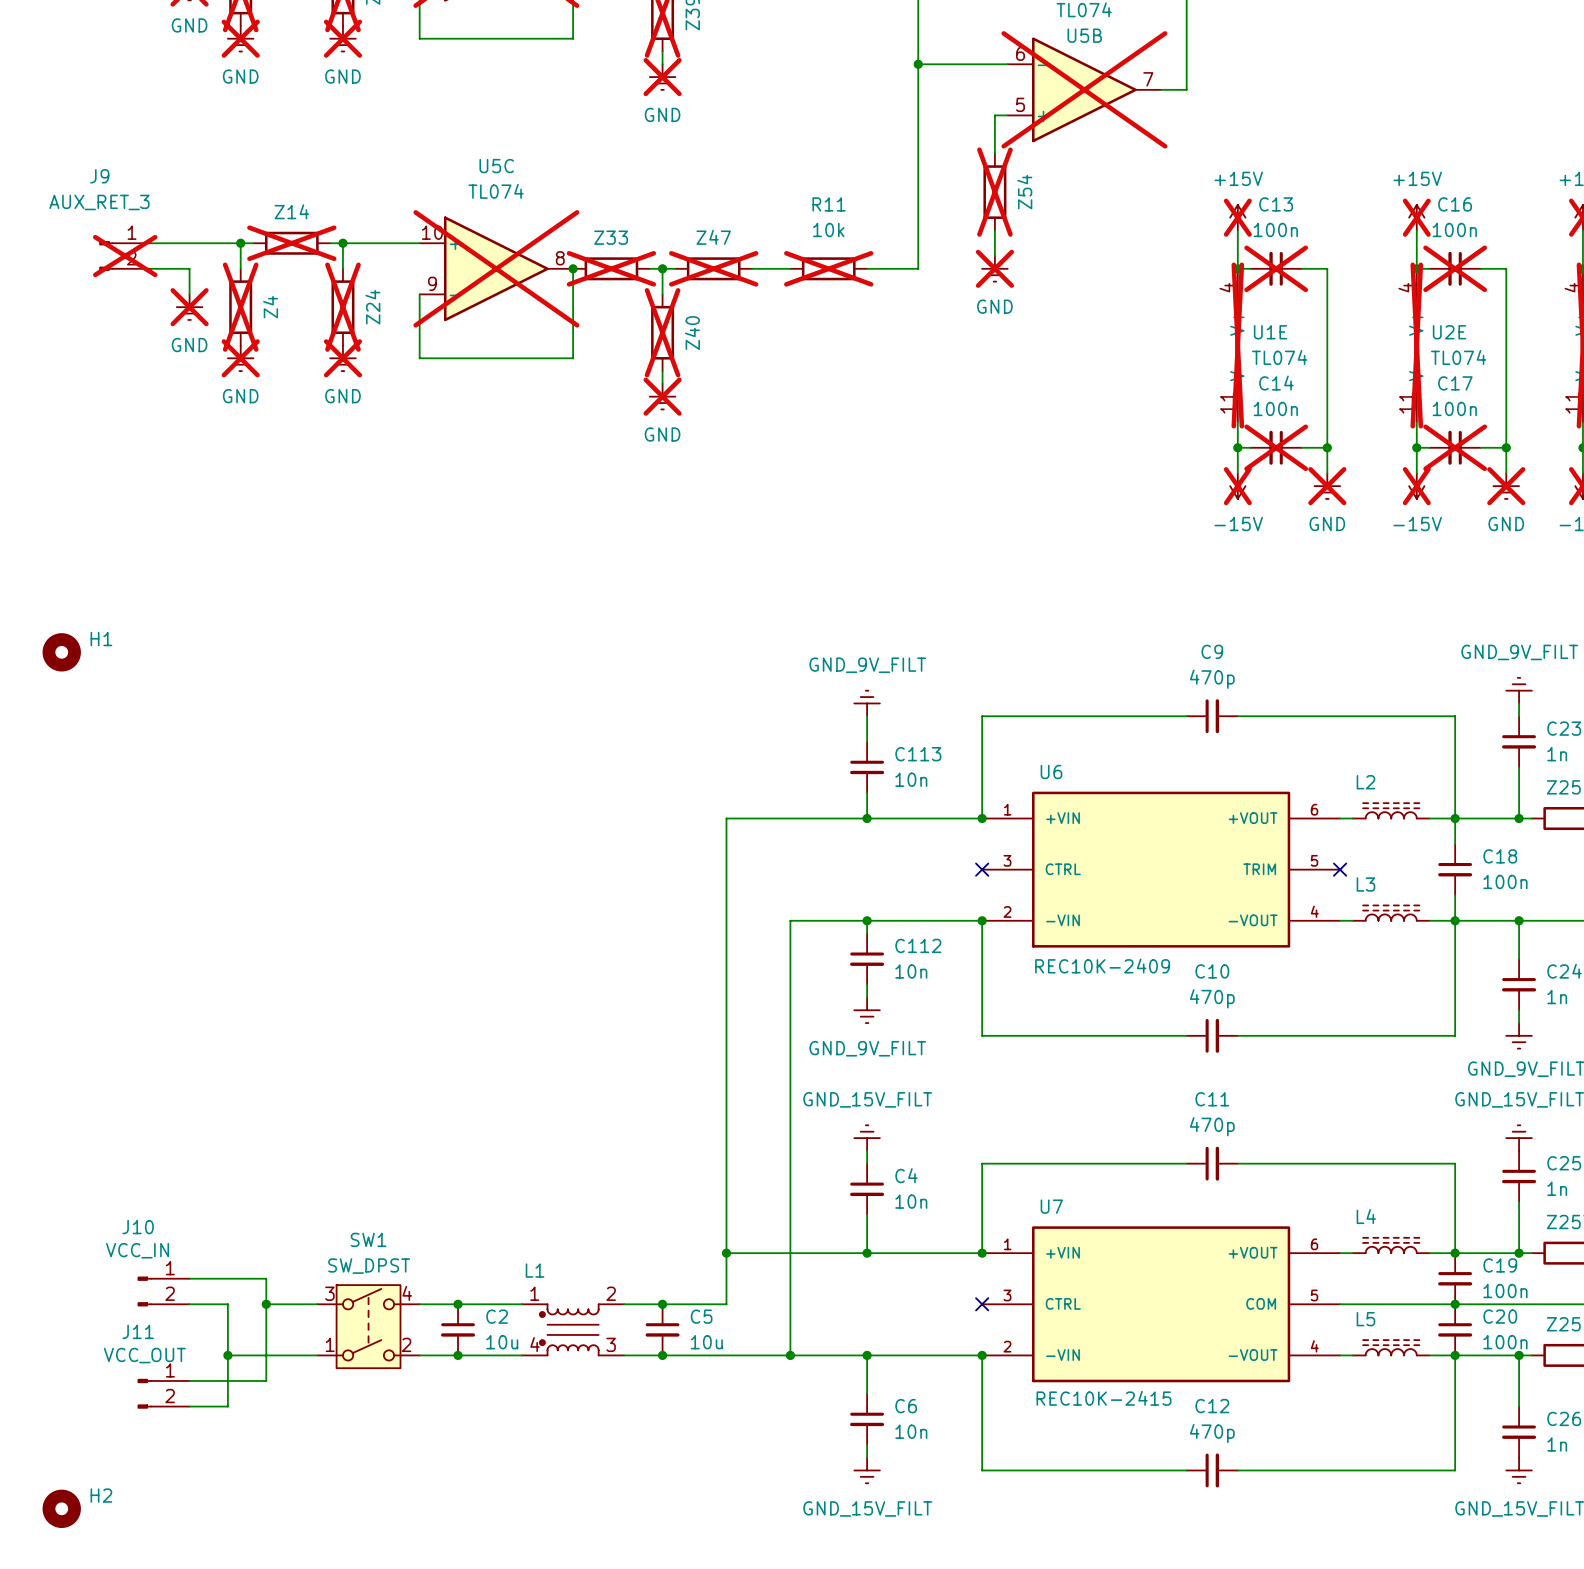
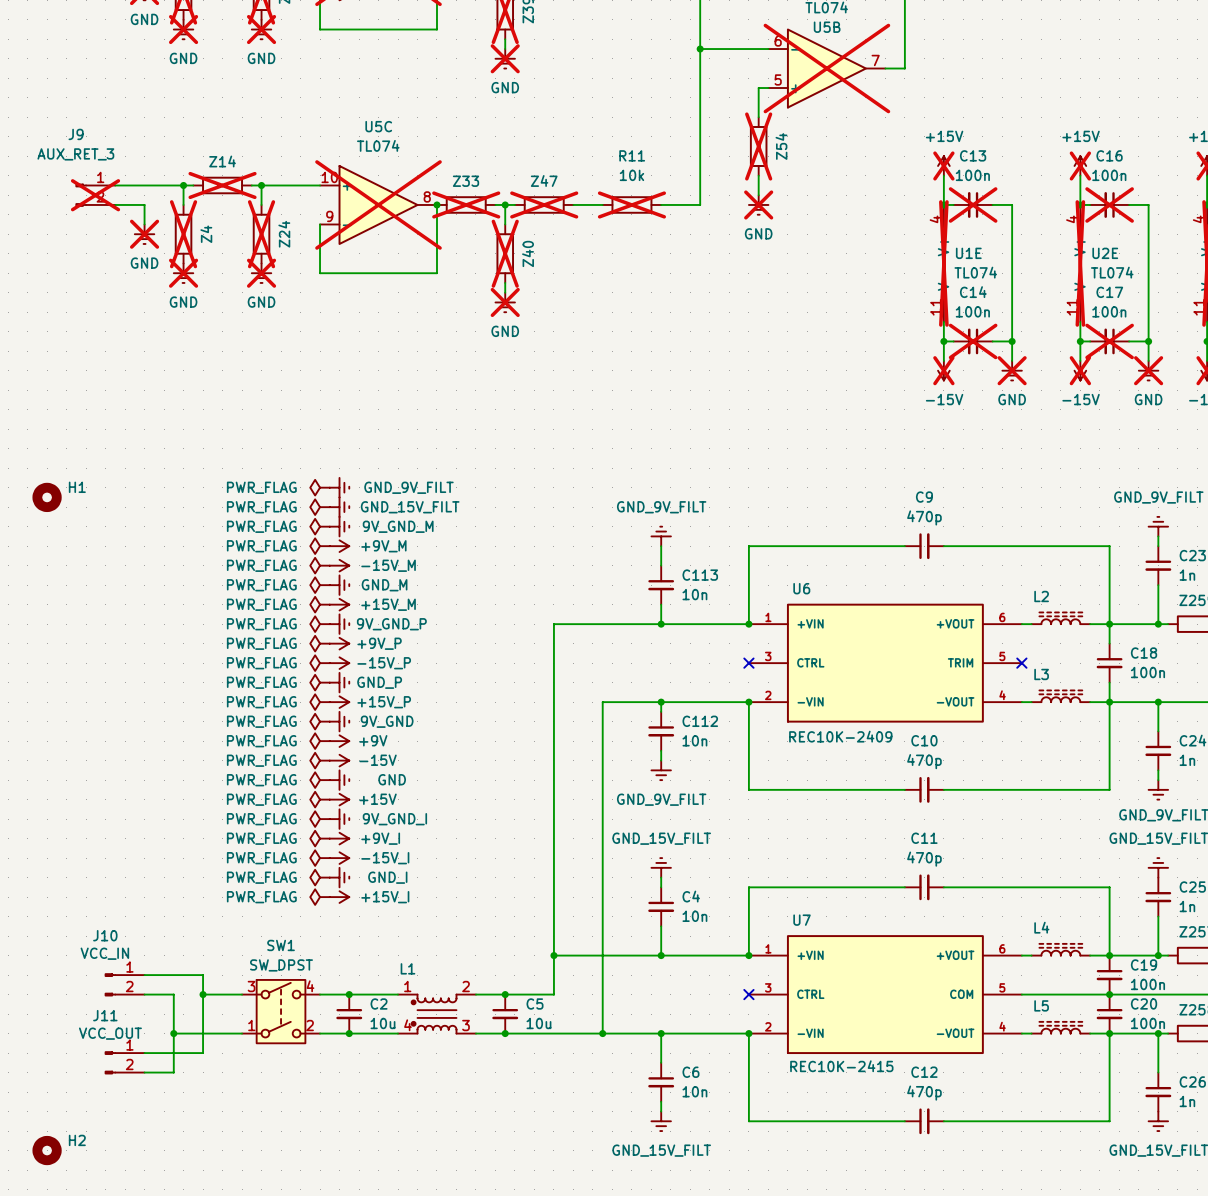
power symbol: none -> PWR_FLAG (320, 487)
power symbol: none -> GND_9V_FILT (339, 487)
power symbol: none -> PWR_FLAG (320, 507)
power symbol: none -> GND_15V_FILT (339, 507)
power symbol: none -> PWR_FLAG (320, 526)
power symbol: none -> 9V_GND_M (339, 526)
power symbol: none -> PWR_FLAG (320, 546)
power symbol: none -> +9V_M (339, 546)
power symbol: none -> PWR_FLAG (320, 565)
power symbol: none -> -15V_M (339, 565)
power symbol: none -> PWR_FLAG (320, 585)
power symbol: none -> GND_M (339, 585)
power symbol: none -> PWR_FLAG (320, 604)
power symbol: none -> +15V_M (339, 604)
power symbol: none -> PWR_FLAG (320, 624)
power symbol: none -> 9V_GND_P (339, 624)
power symbol: none -> PWR_FLAG (320, 643)
power symbol: none -> +9V_P (339, 643)
power symbol: none -> PWR_FLAG (320, 663)
power symbol: none -> -15V_P (339, 663)
power symbol: none -> PWR_FLAG (320, 682)
power symbol: none -> GND_P (339, 682)
power symbol: none -> PWR_FLAG (320, 702)
power symbol: none -> +15V_P (339, 702)
power symbol: none -> PWR_FLAG (320, 721)
power symbol: none -> 9V_GND (339, 721)
power symbol: none -> PWR_FLAG (320, 741)
power symbol: none -> +9V (339, 741)
power symbol: none -> PWR_FLAG (320, 760)
power symbol: none -> -15V (339, 760)
power symbol: none -> PWR_FLAG (320, 780)
power symbol: none -> GND (339, 780)
power symbol: none -> PWR_FLAG (320, 799)
power symbol: none -> +15V (339, 799)
power symbol: none -> PWR_FLAG (320, 819)
power symbol: none -> 9V_GND_I (339, 819)
power symbol: none -> PWR_FLAG (320, 838)
power symbol: none -> +9V_I (339, 838)
power symbol: none -> PWR_FLAG (320, 858)
power symbol: none -> -15V_I (339, 858)
power symbol: none -> PWR_FLAG (320, 877)
power symbol: none -> GND_I (339, 877)
power symbol: none -> PWR_FLAG (320, 897)
power symbol: none -> +15V_I (339, 897)

